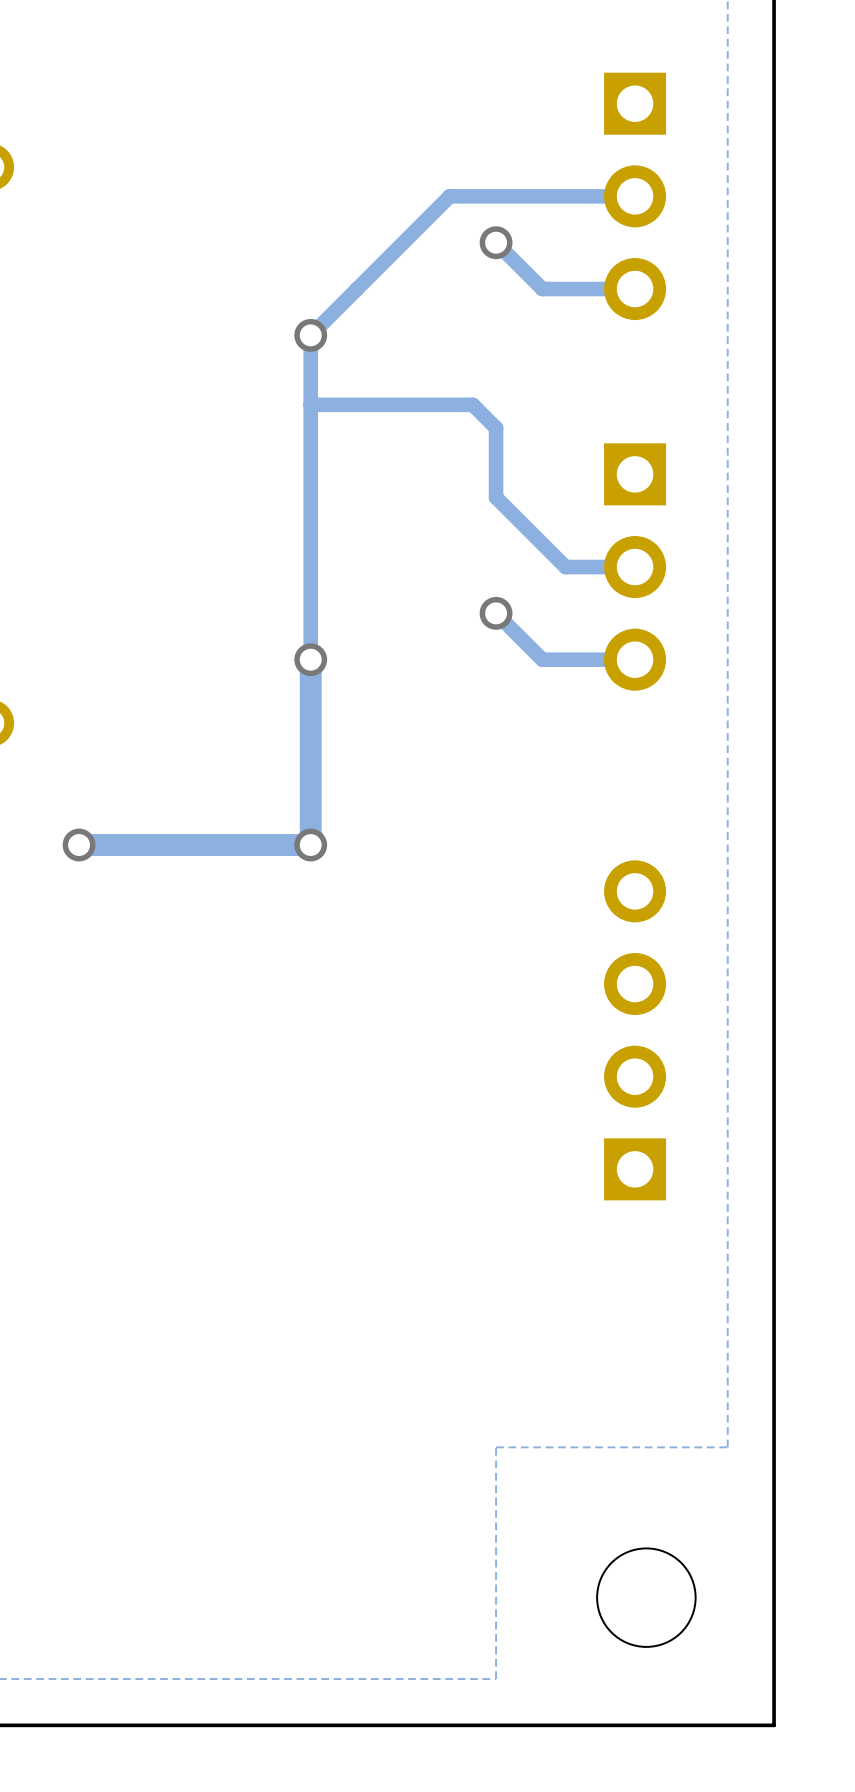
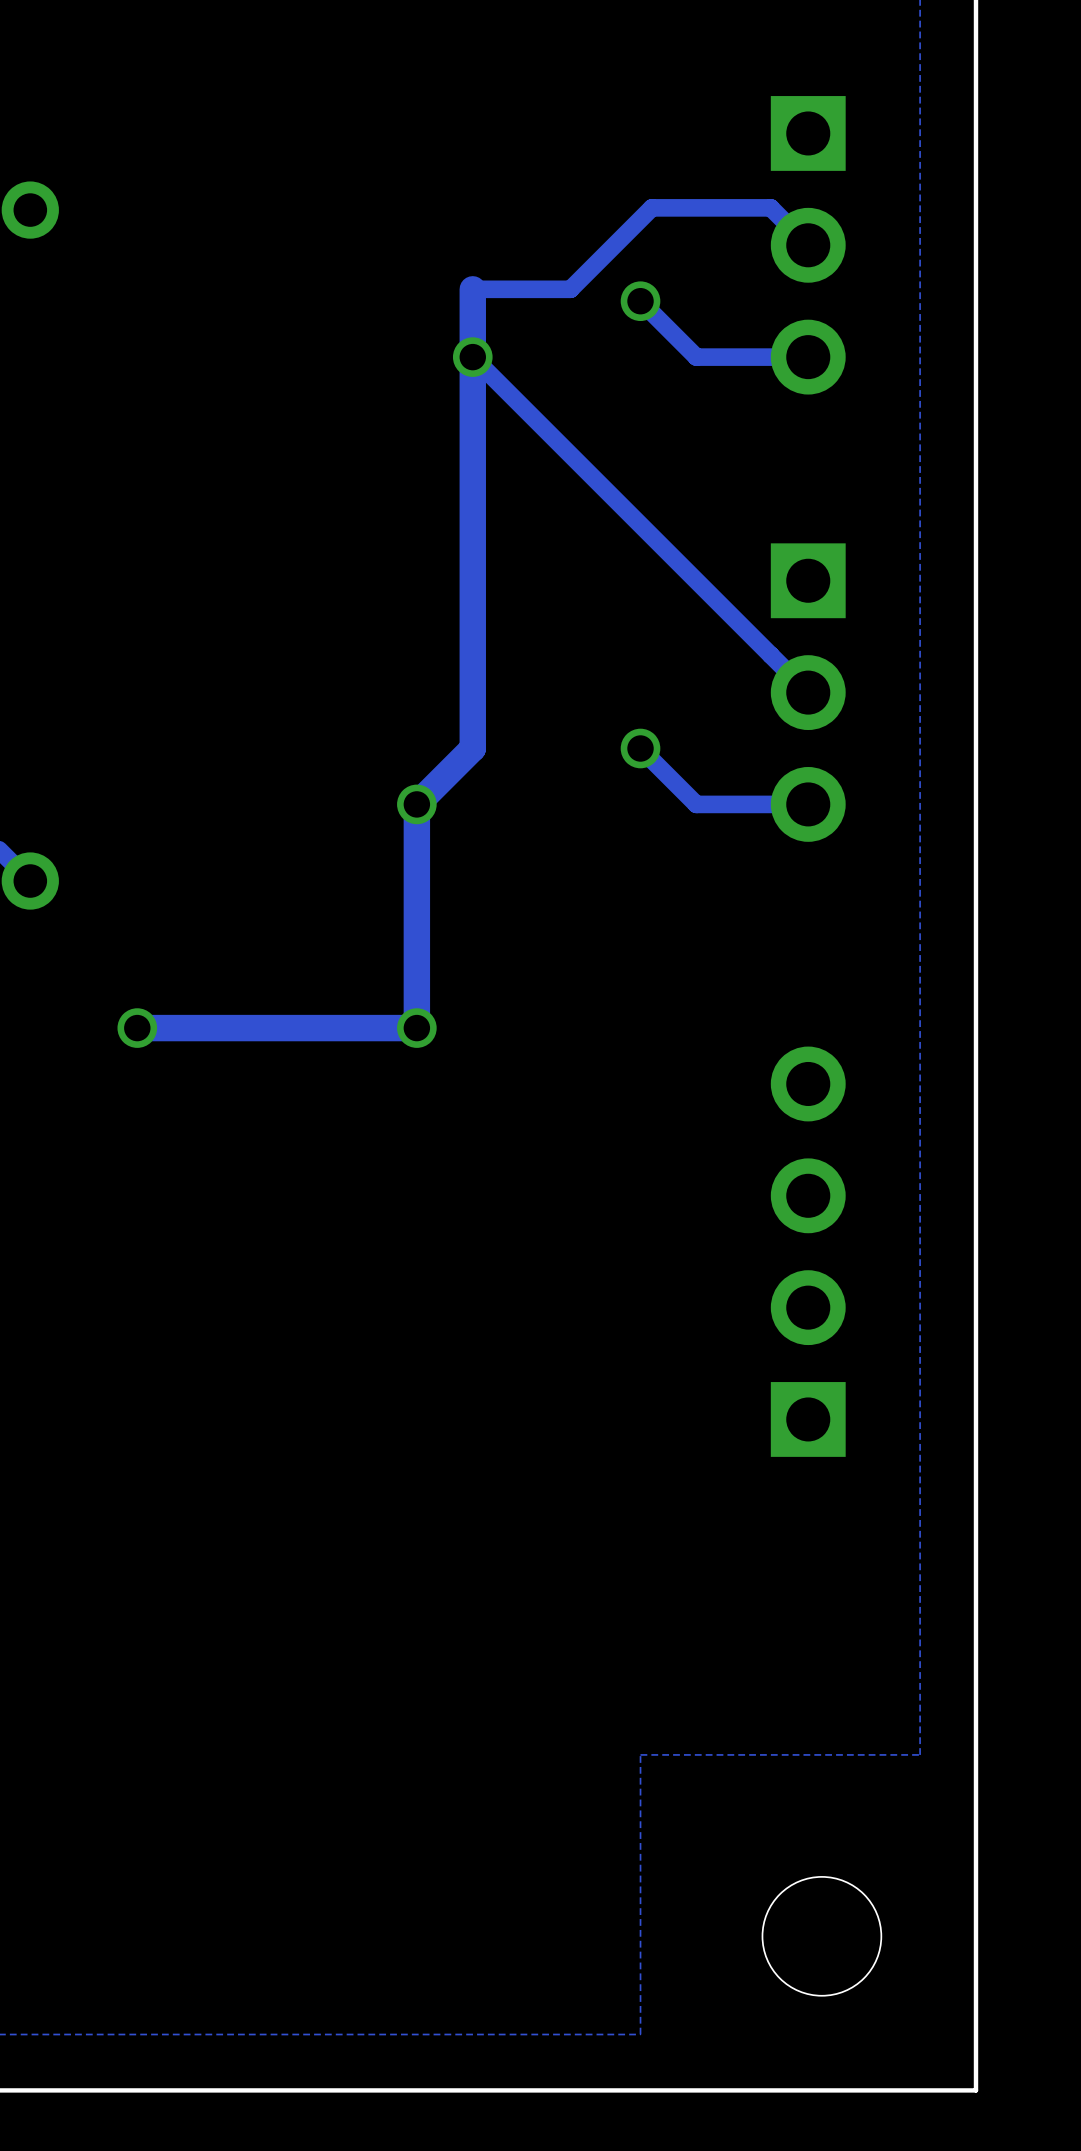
track: (635, 196) (449, 196) (310, 335) (310, 659) -> (808, 245) (770, 207) (651, 207) (570, 289) (472, 289) (472, 748) (416, 804)
via position: (310, 335) -> (472, 357)
track: (472, 404) (310, 404) -> (612, 496) (472, 357)
track: (496, 428) (496, 497) (565, 567) (635, 567) -> (640, 524) (808, 692)

